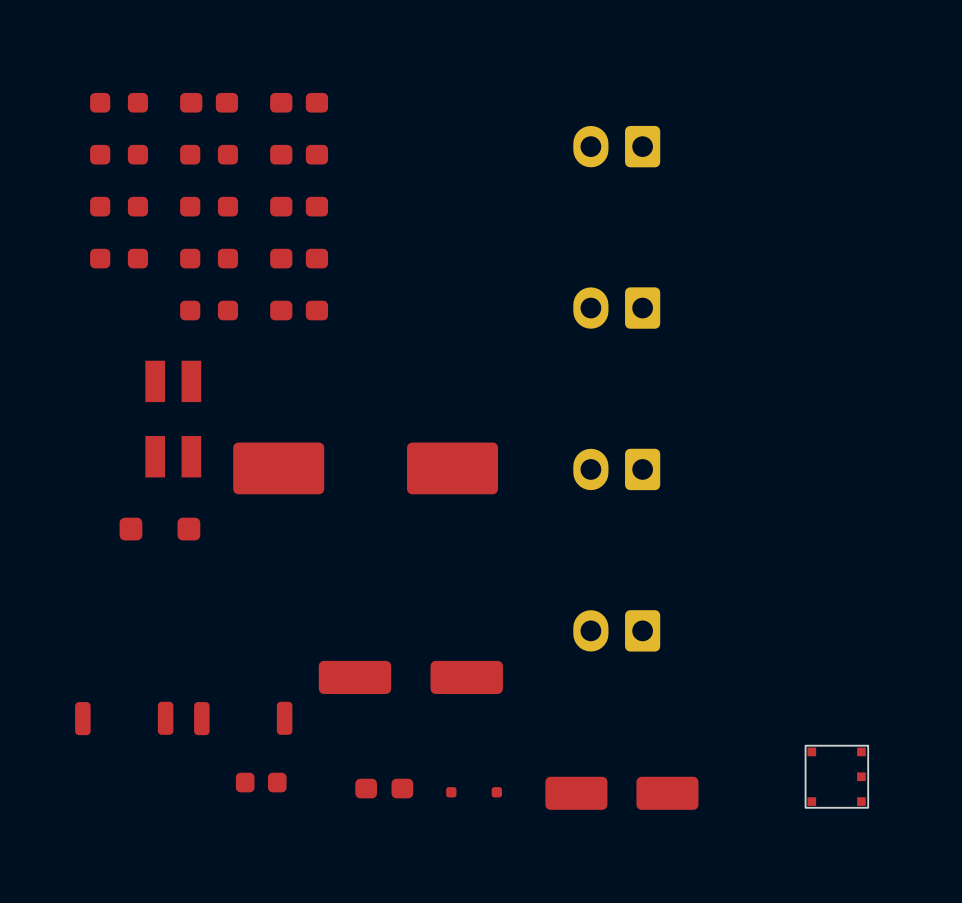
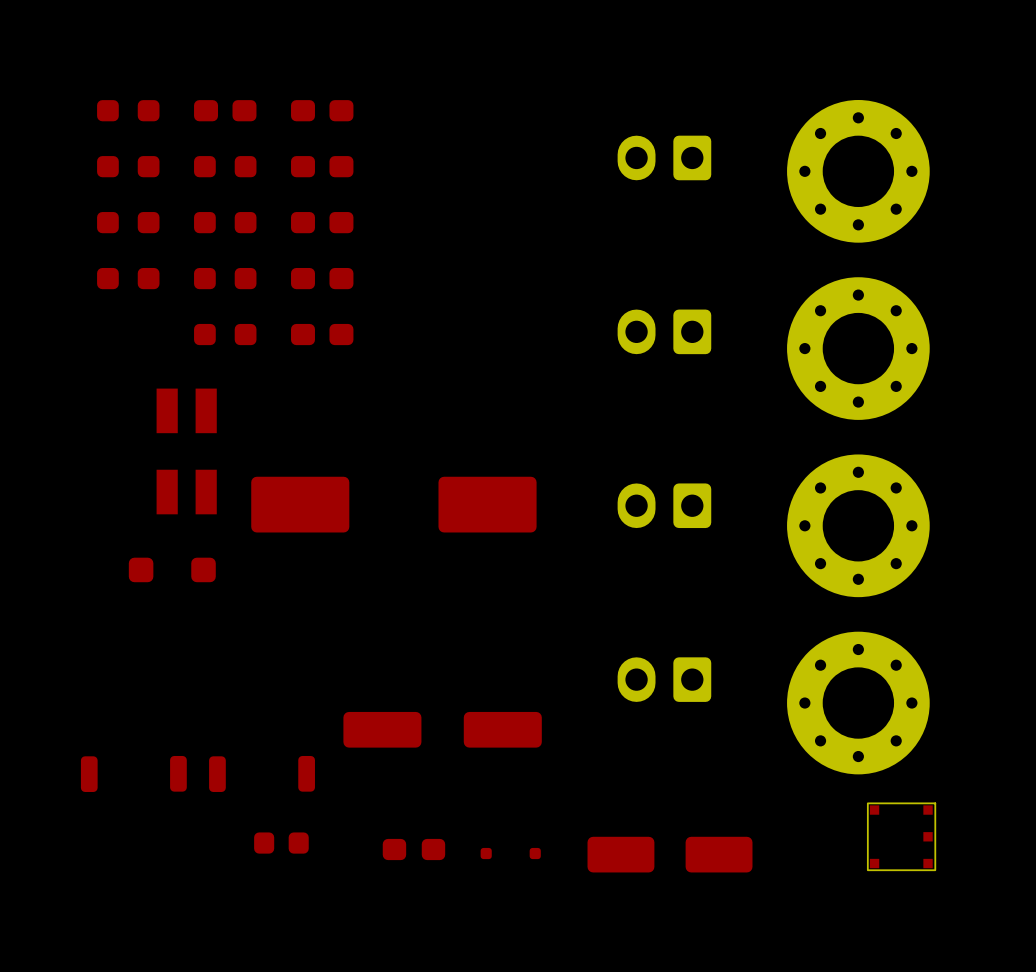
part: none -> (858, 171)
part: none -> (858, 348)
part: none -> (858, 525)
part: none -> (858, 703)

